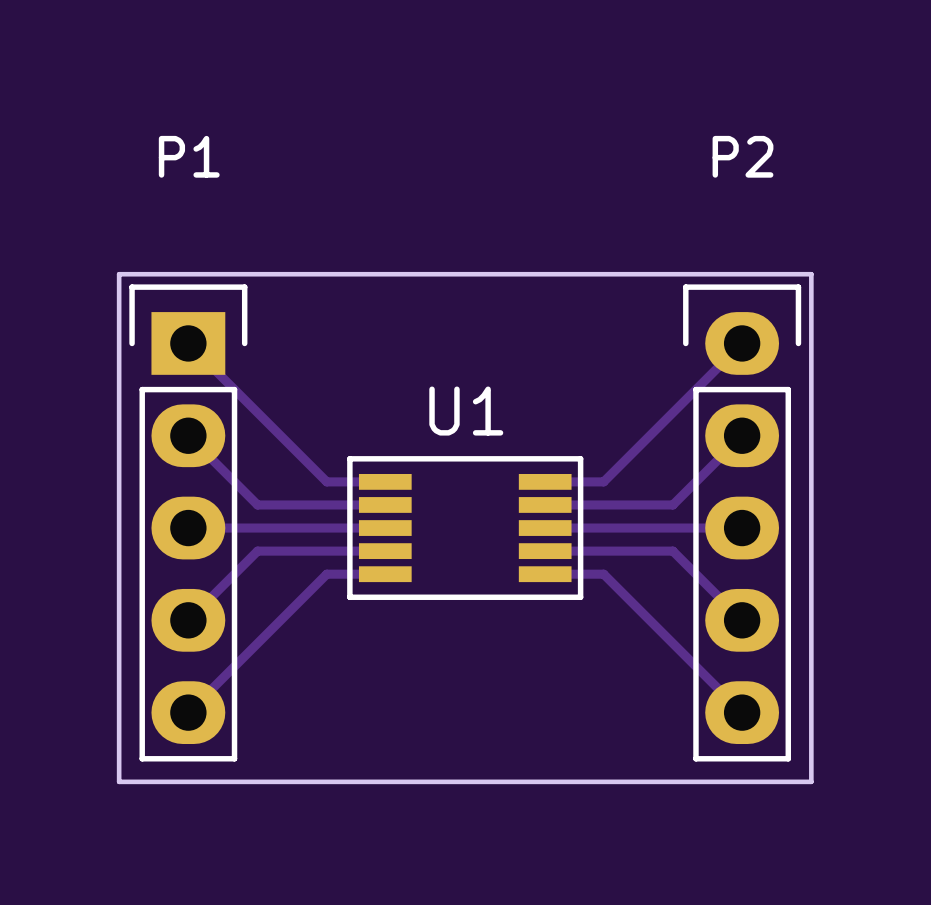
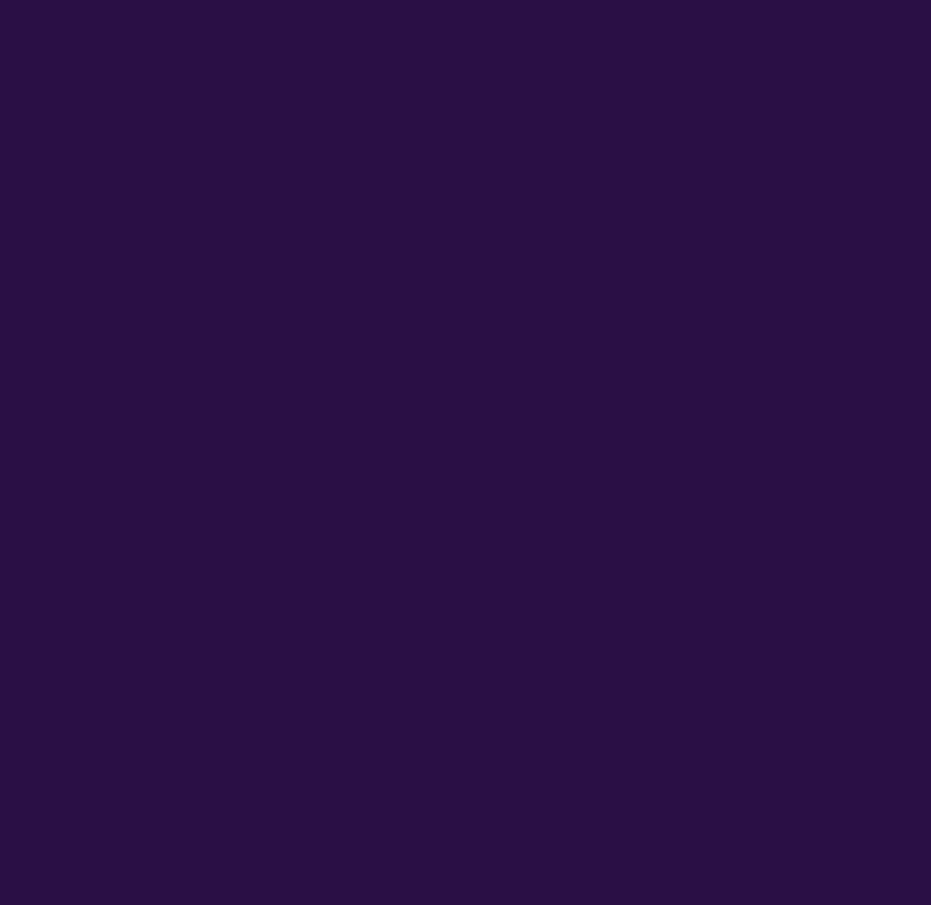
board edge: (119, 274) (811, 274) (811, 781) (119, 781) (119, 274) -> none
track: (188, 343) (326, 481) (385, 481) -> none
track: (742, 343) (603, 481) (545, 481) -> none
track: (188, 435) (257, 504) (385, 504) -> none
track: (742, 435) (672, 504) (545, 504) -> none
P1: (188, 522) -> none
P2: (742, 522) -> none
track: (188, 528) (385, 528) -> none
U1: (465, 528) -> none
track: (545, 528) (742, 528) -> none
track: (385, 551) (257, 551) (188, 620) -> none
track: (545, 551) (672, 551) (742, 620) -> none
track: (385, 574) (326, 574) (188, 712) -> none
track: (545, 574) (603, 574) (742, 712) -> none

